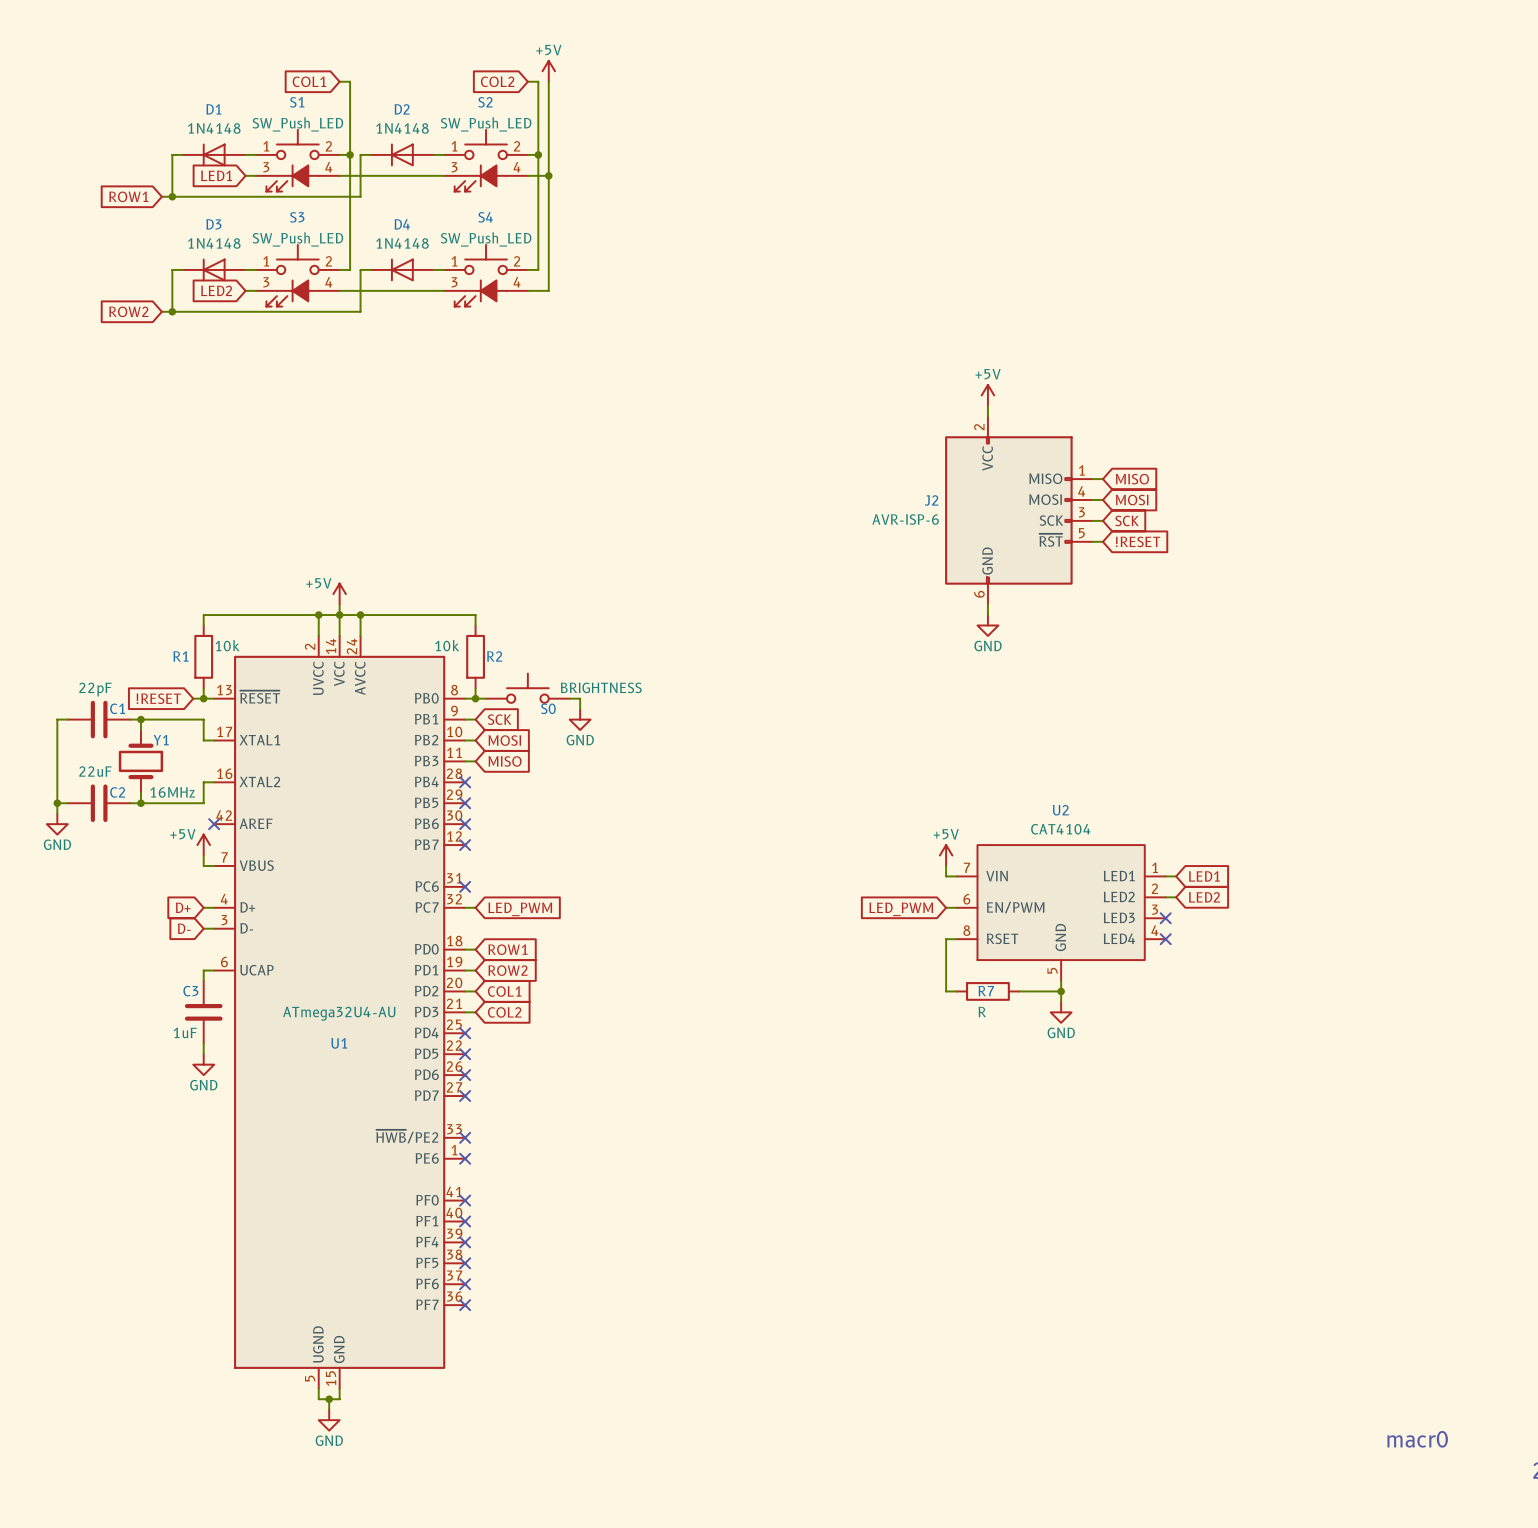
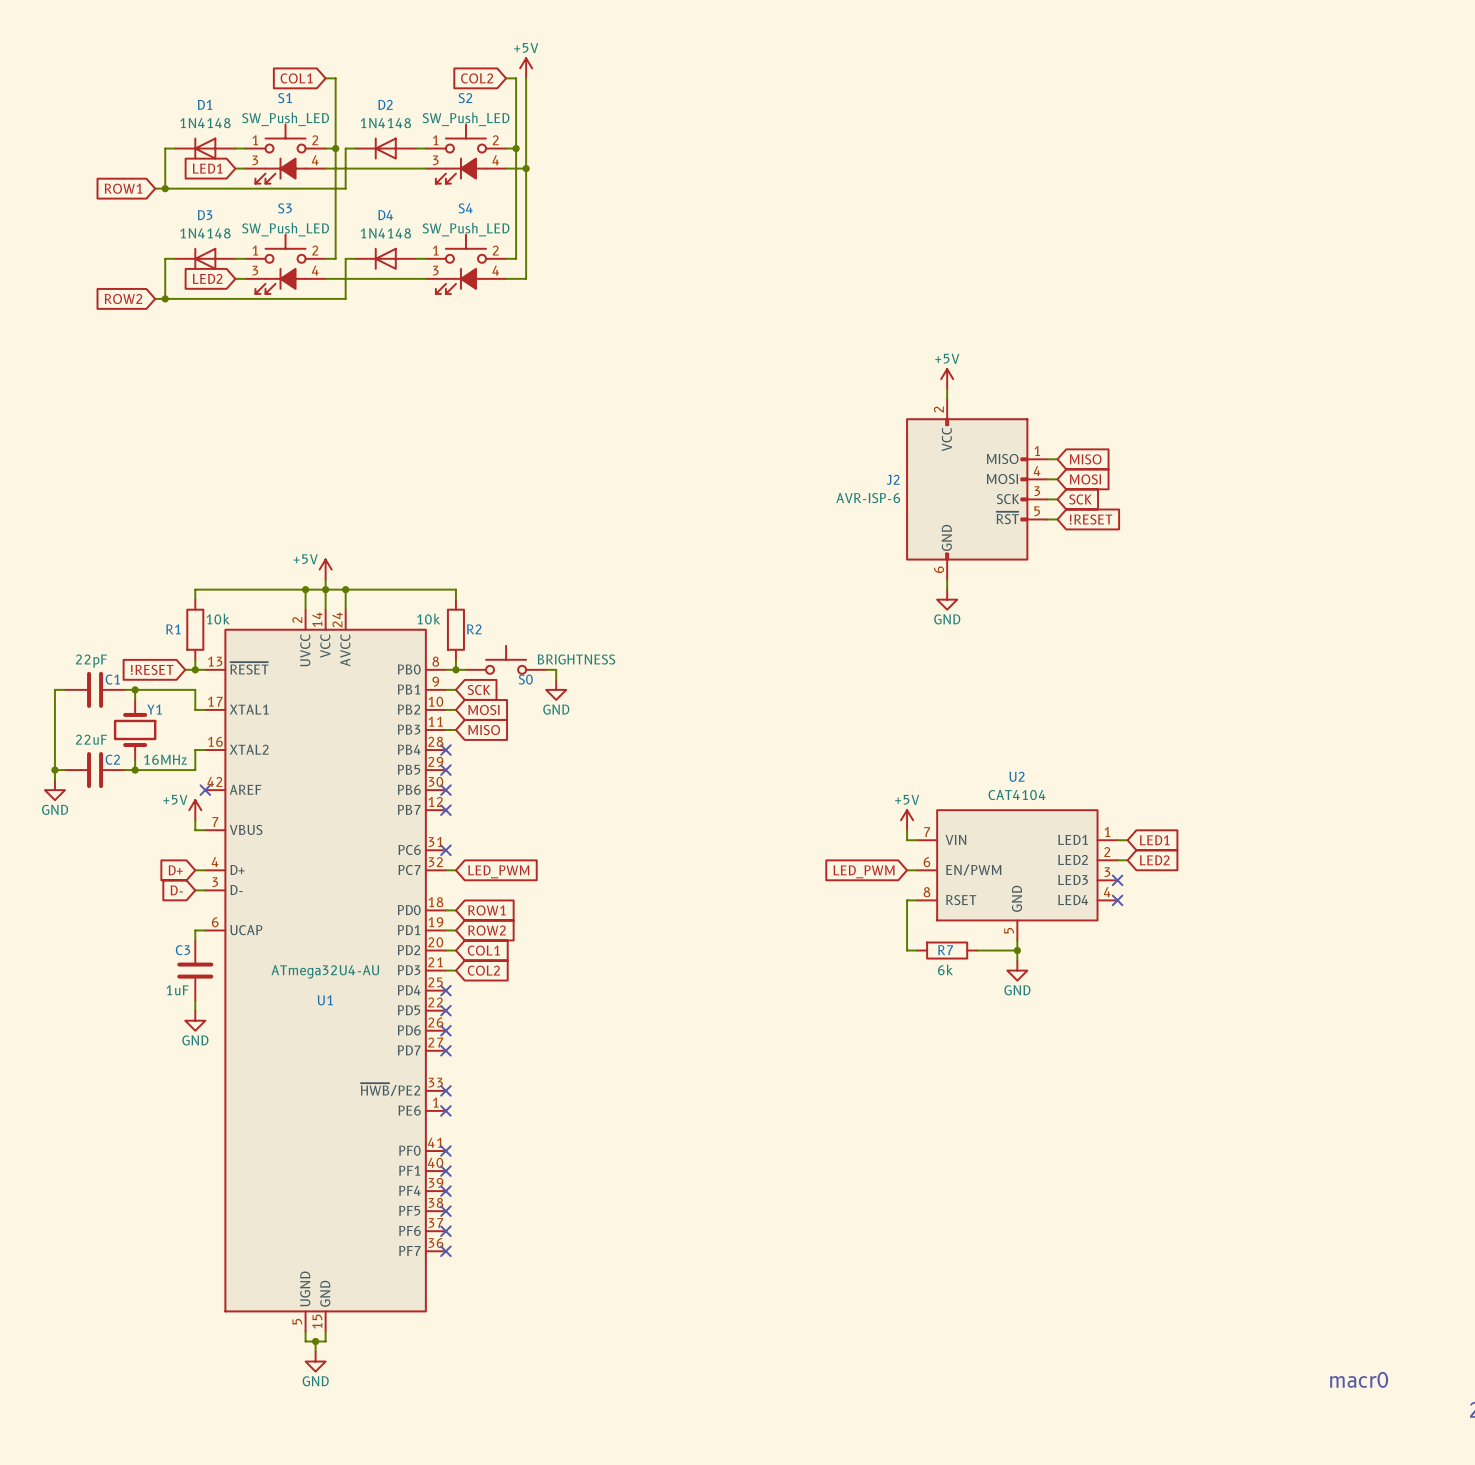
R7 value: R (982, 1012) -> 6k (945, 969)

